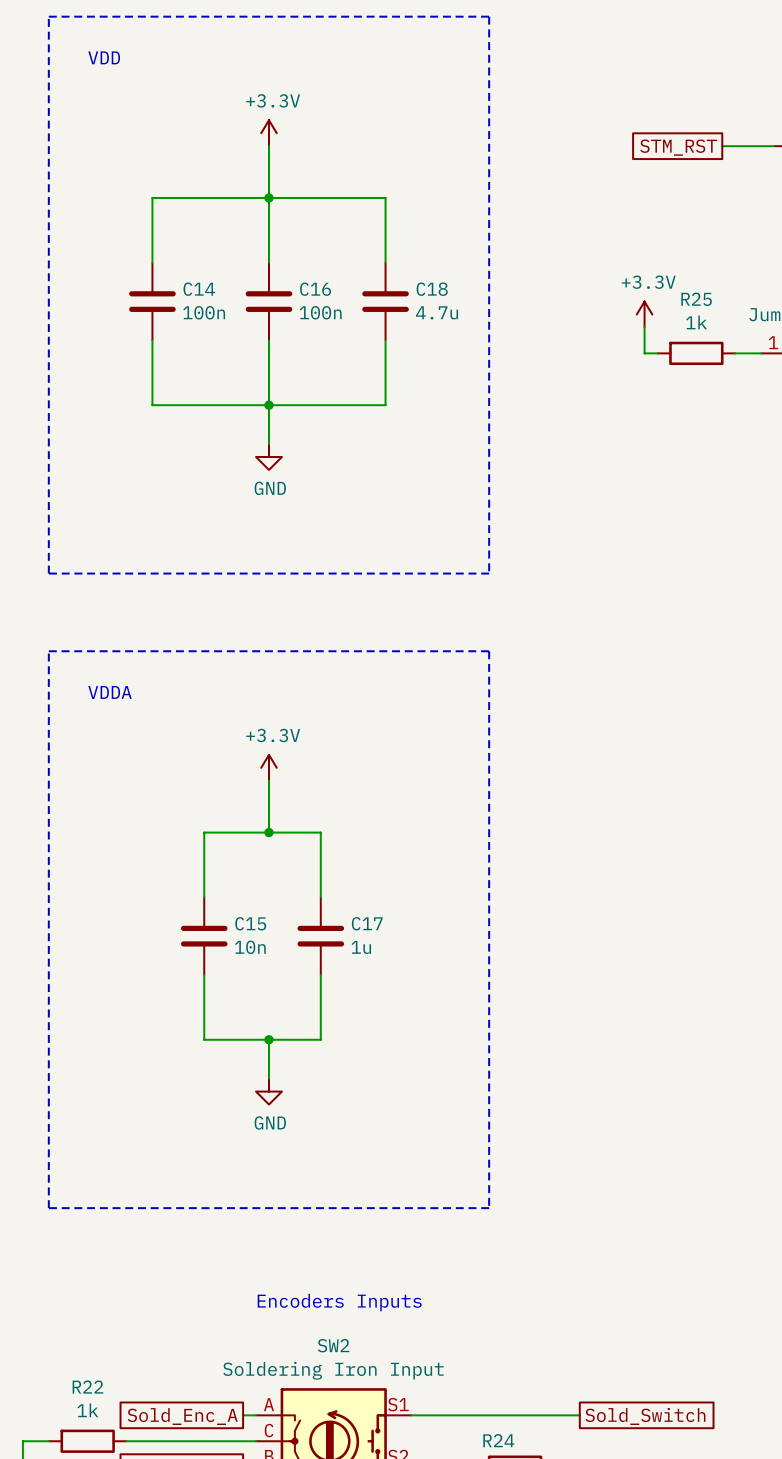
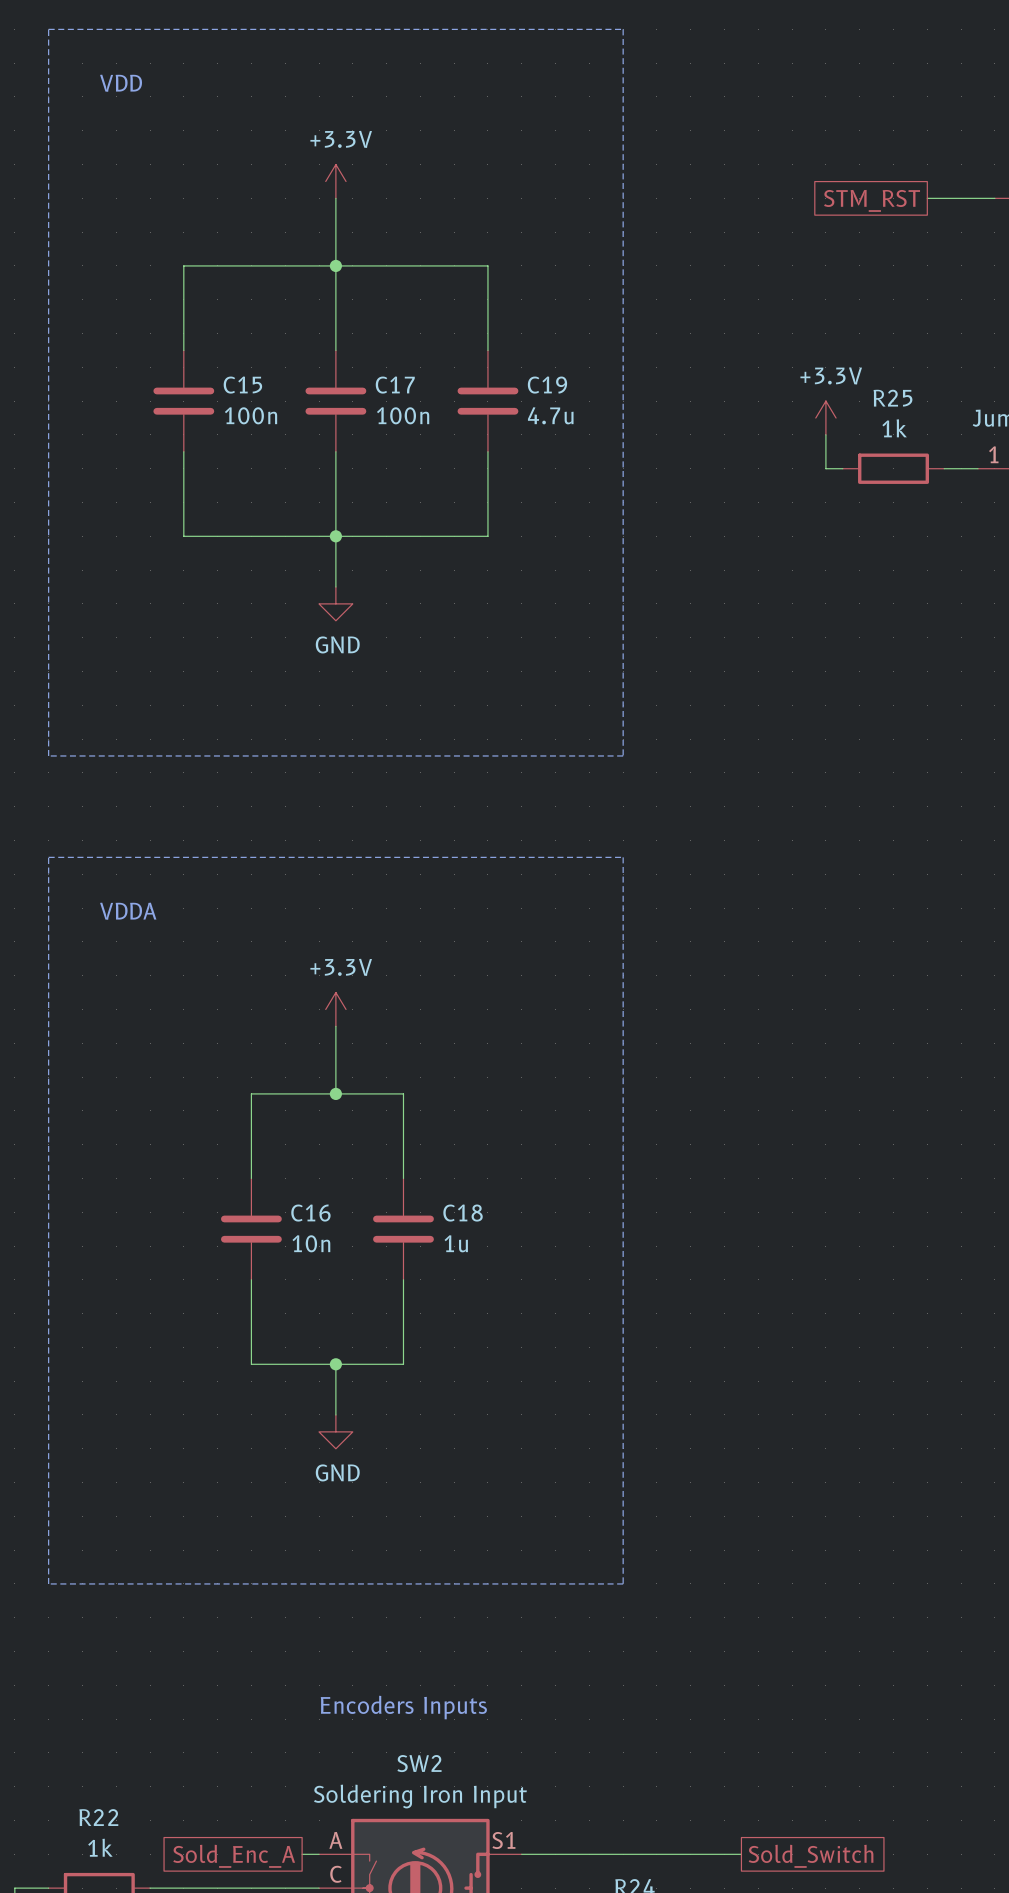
C14 name: C14 (199, 289) -> C15 (242, 385)
C16 name: C16 (315, 289) -> C17 (395, 385)
C18 name: C18 (432, 289) -> C19 (547, 385)
C15 name: C15 (250, 923) -> C16 (310, 1213)
C17 name: C17 (367, 923) -> C18 (463, 1213)

